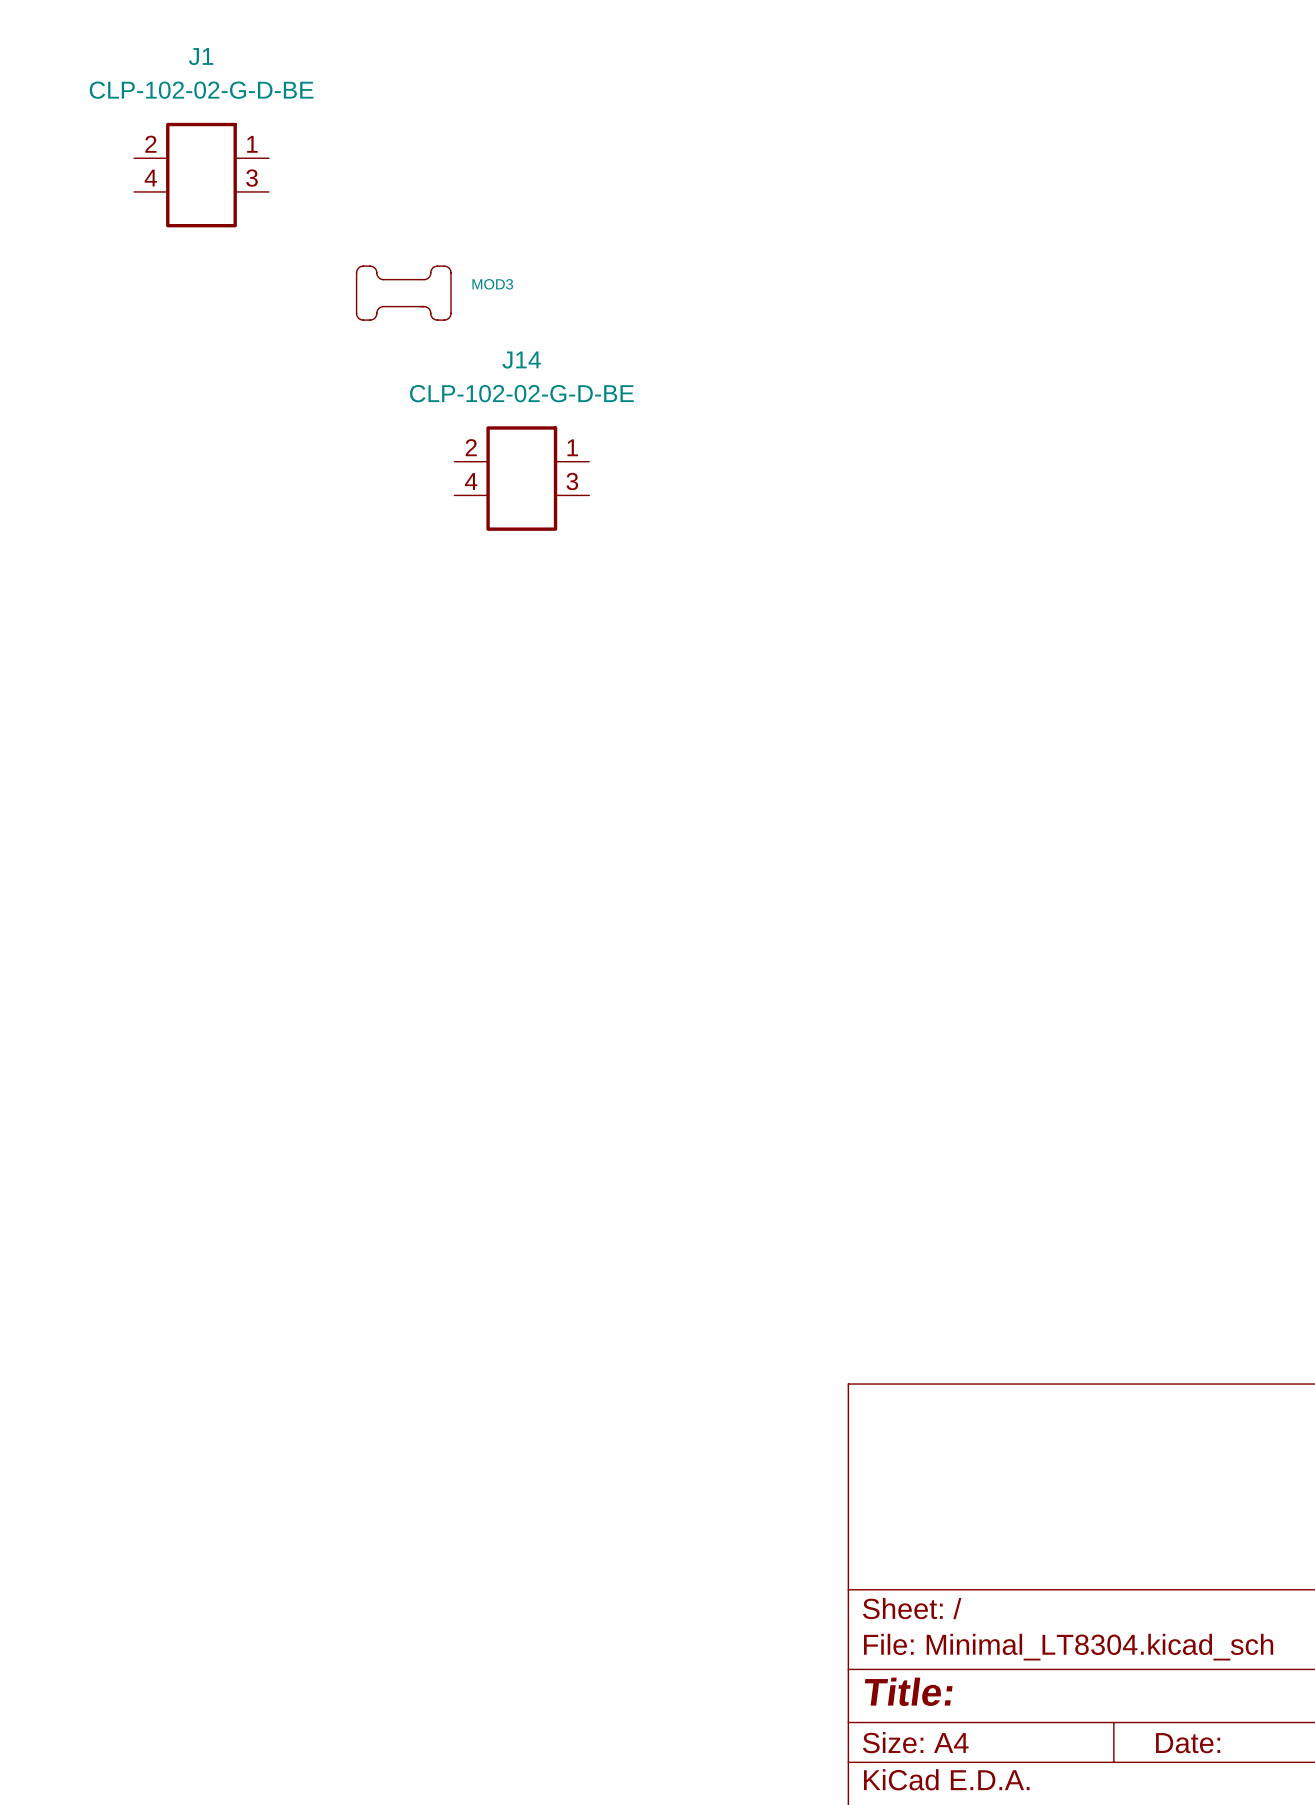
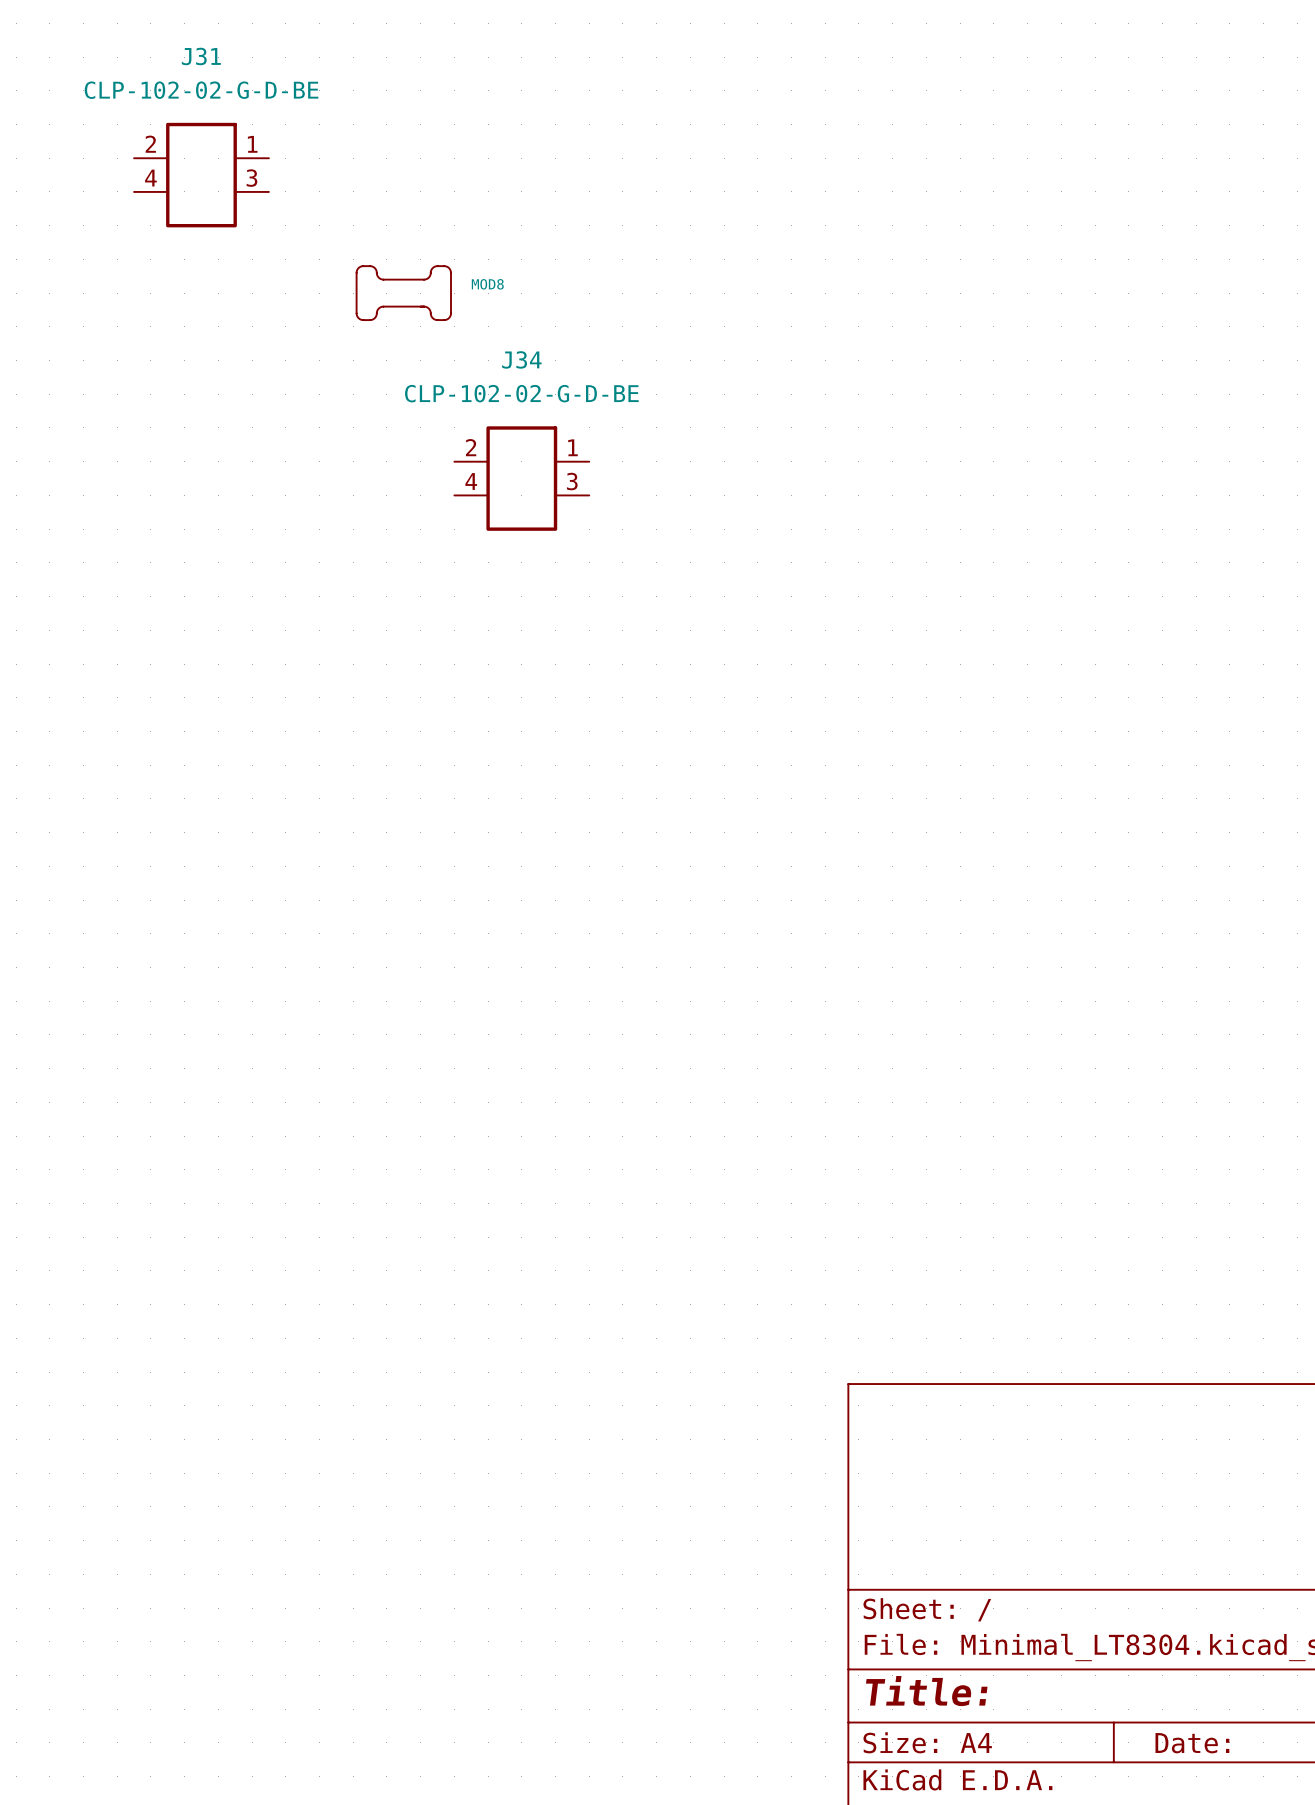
J1 name: J1 (201, 56) -> J31 (201, 56)
MOD3 name: MOD3 (492, 284) -> MOD8 (487, 284)
J14 name: J14 (521, 360) -> J34 (521, 359)

